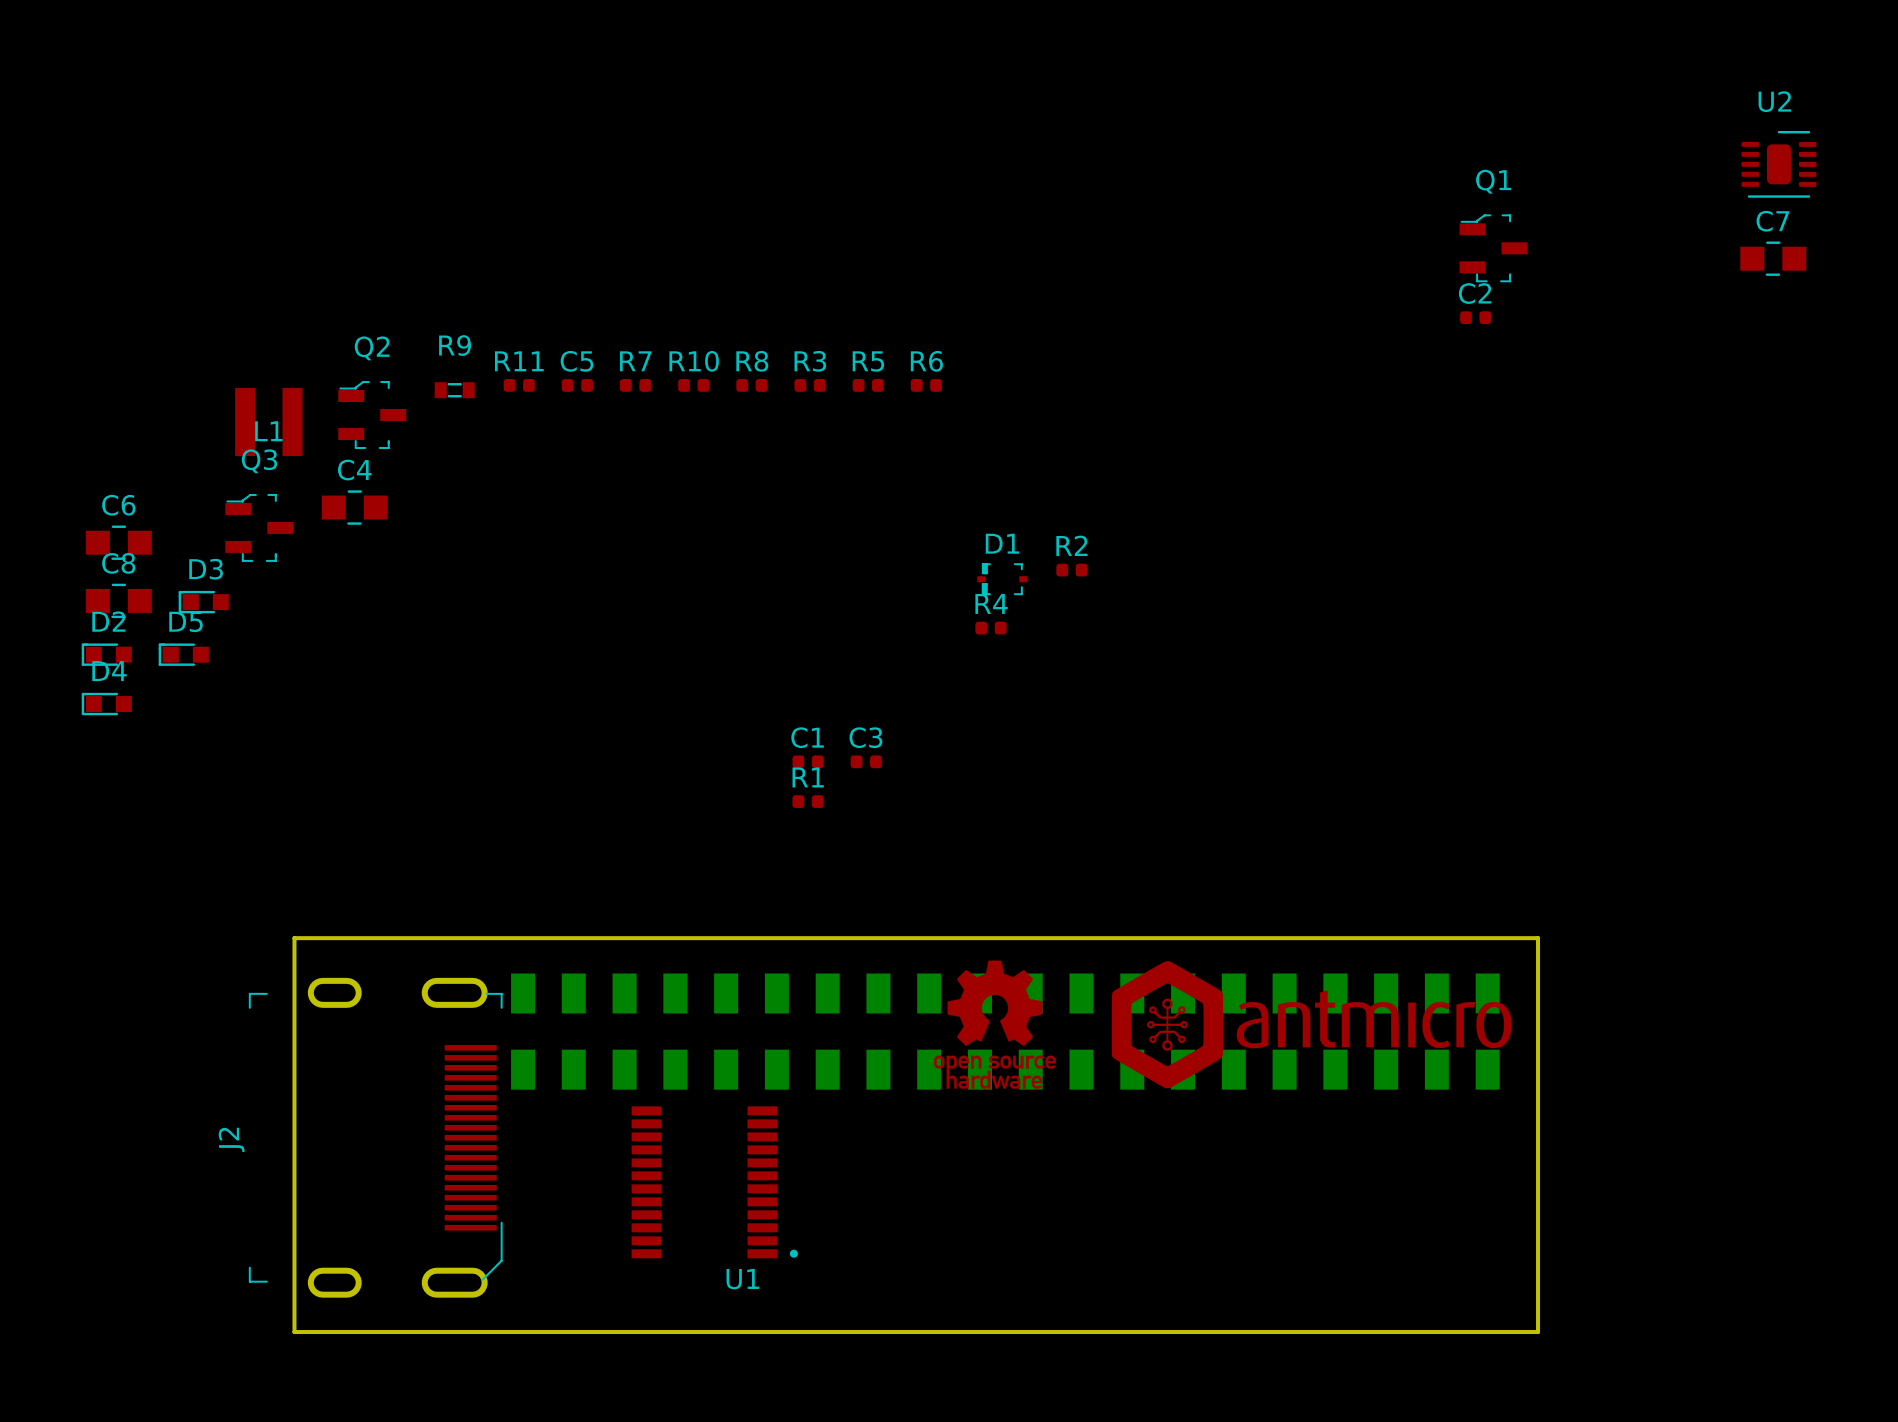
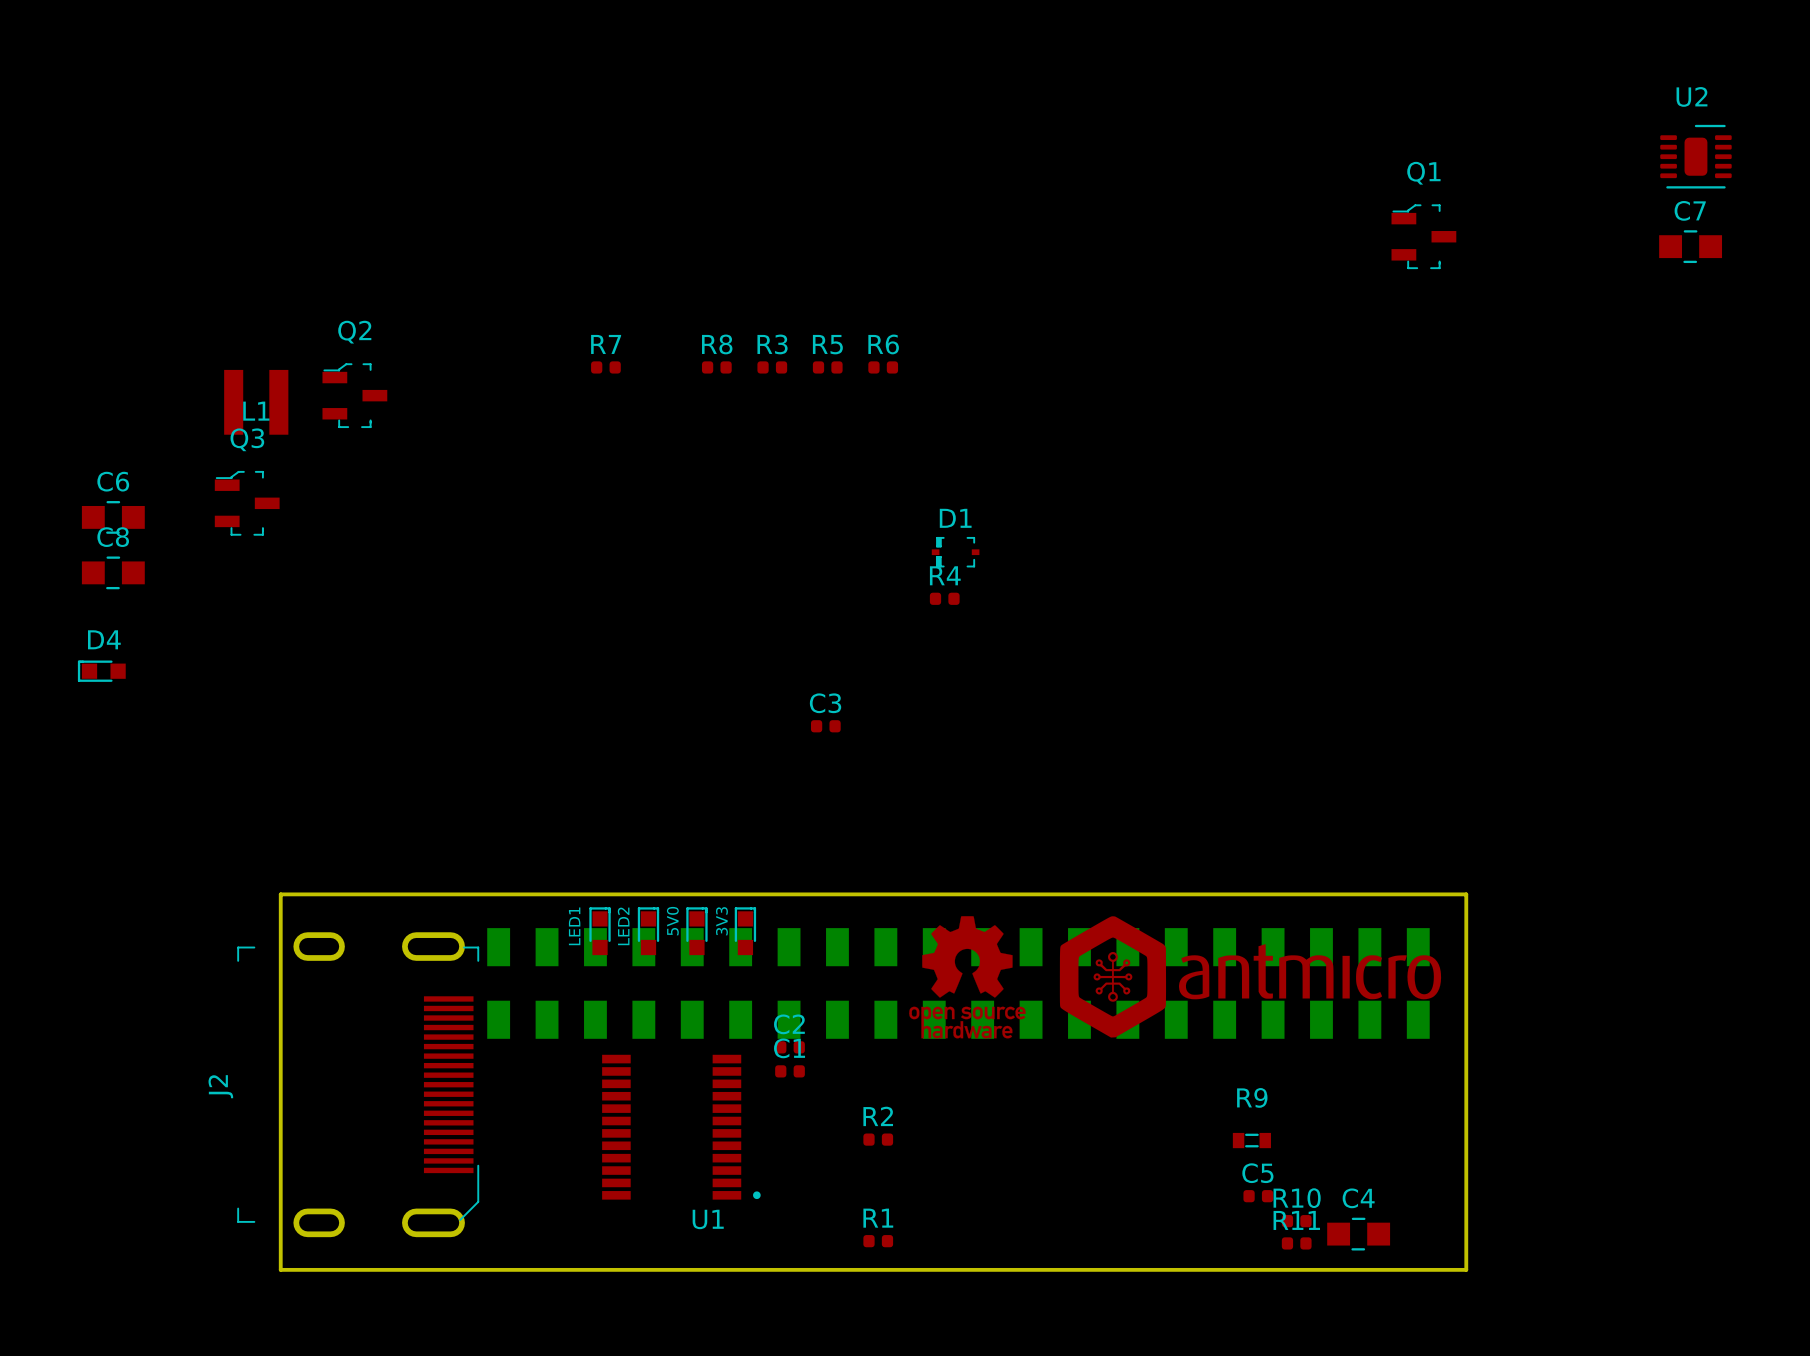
C2 position: (1475, 317) -> (790, 1047)
R11 position: (519, 385) -> (1296, 1243)
C5 position: (577, 385) -> (1258, 1196)
R10 position: (693, 385) -> (1296, 1221)
R9 position: (454, 390) -> (1251, 1140)
C4 position: (354, 507) -> (1358, 1234)
R2 position: (1071, 570) -> (878, 1139)
D3: (203, 602) -> none
D2: (106, 654) -> none
D5: (183, 654) -> none
C1 position: (808, 761) -> (790, 1071)
R1 position: (808, 801) -> (878, 1241)
LED1: none -> (600, 931)
LED2: none -> (648, 931)
5V0: none -> (696, 931)
3V3: none -> (745, 931)
drawing position: (994, 1024) -> (967, 977)

